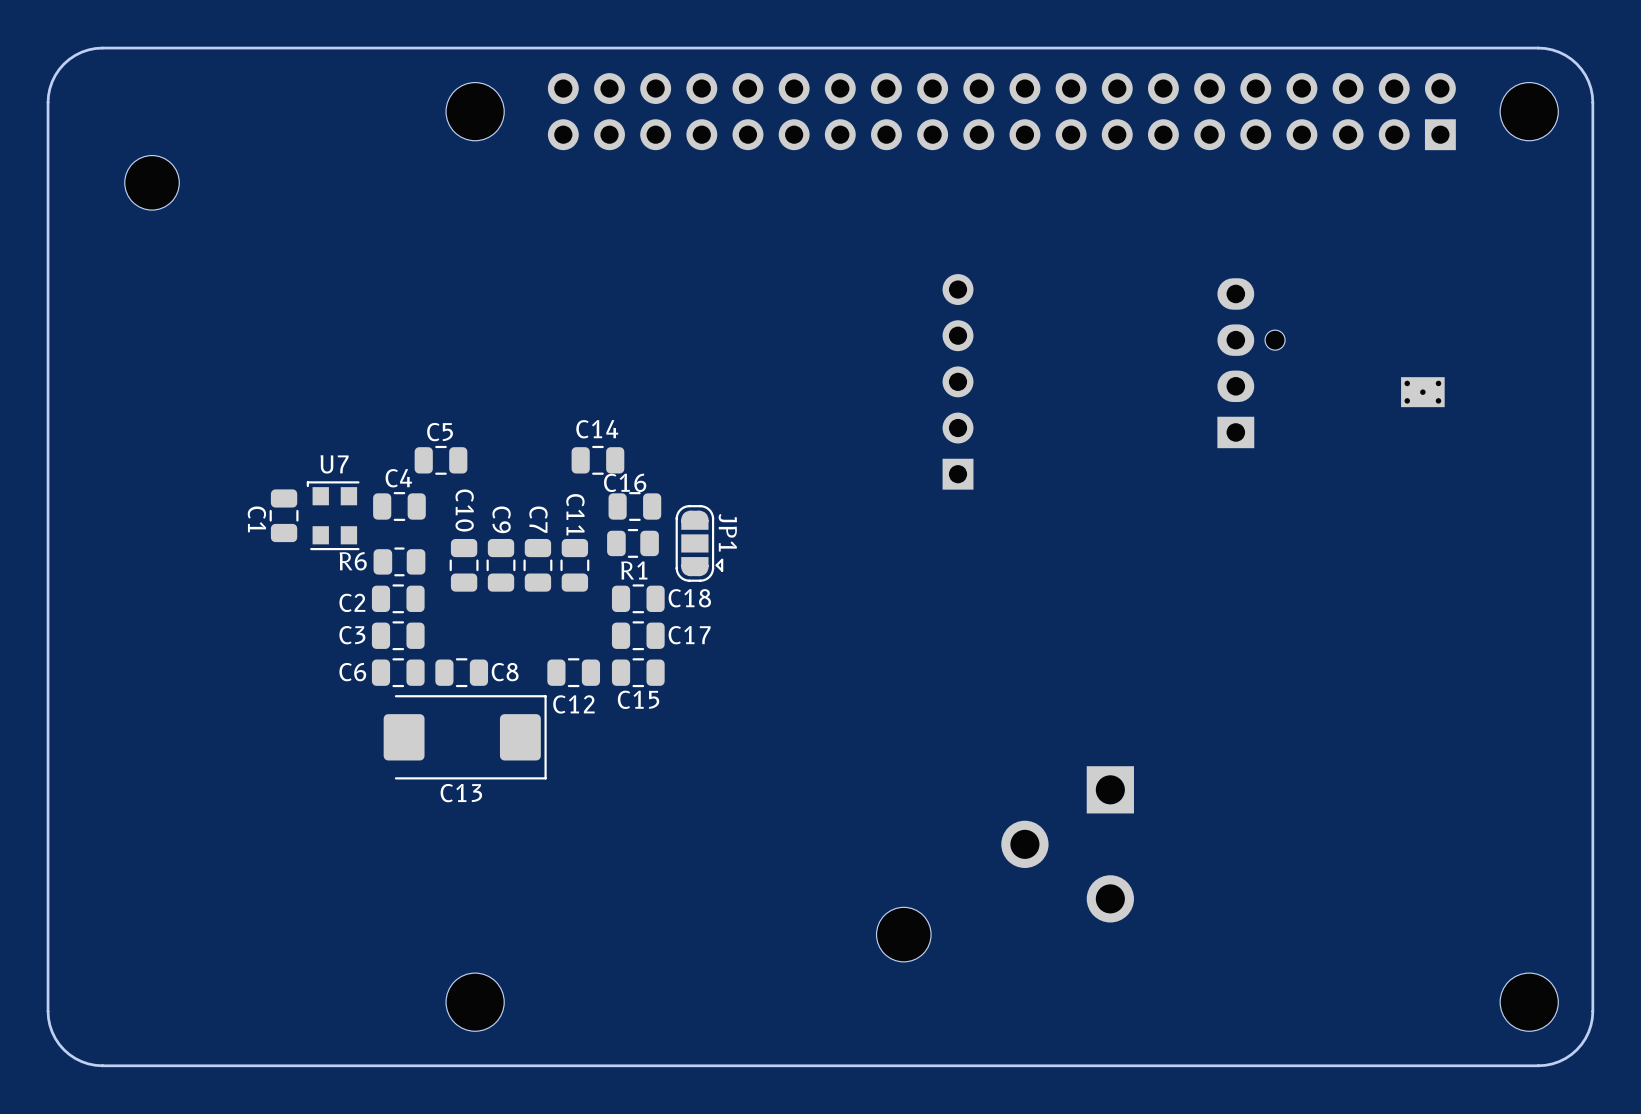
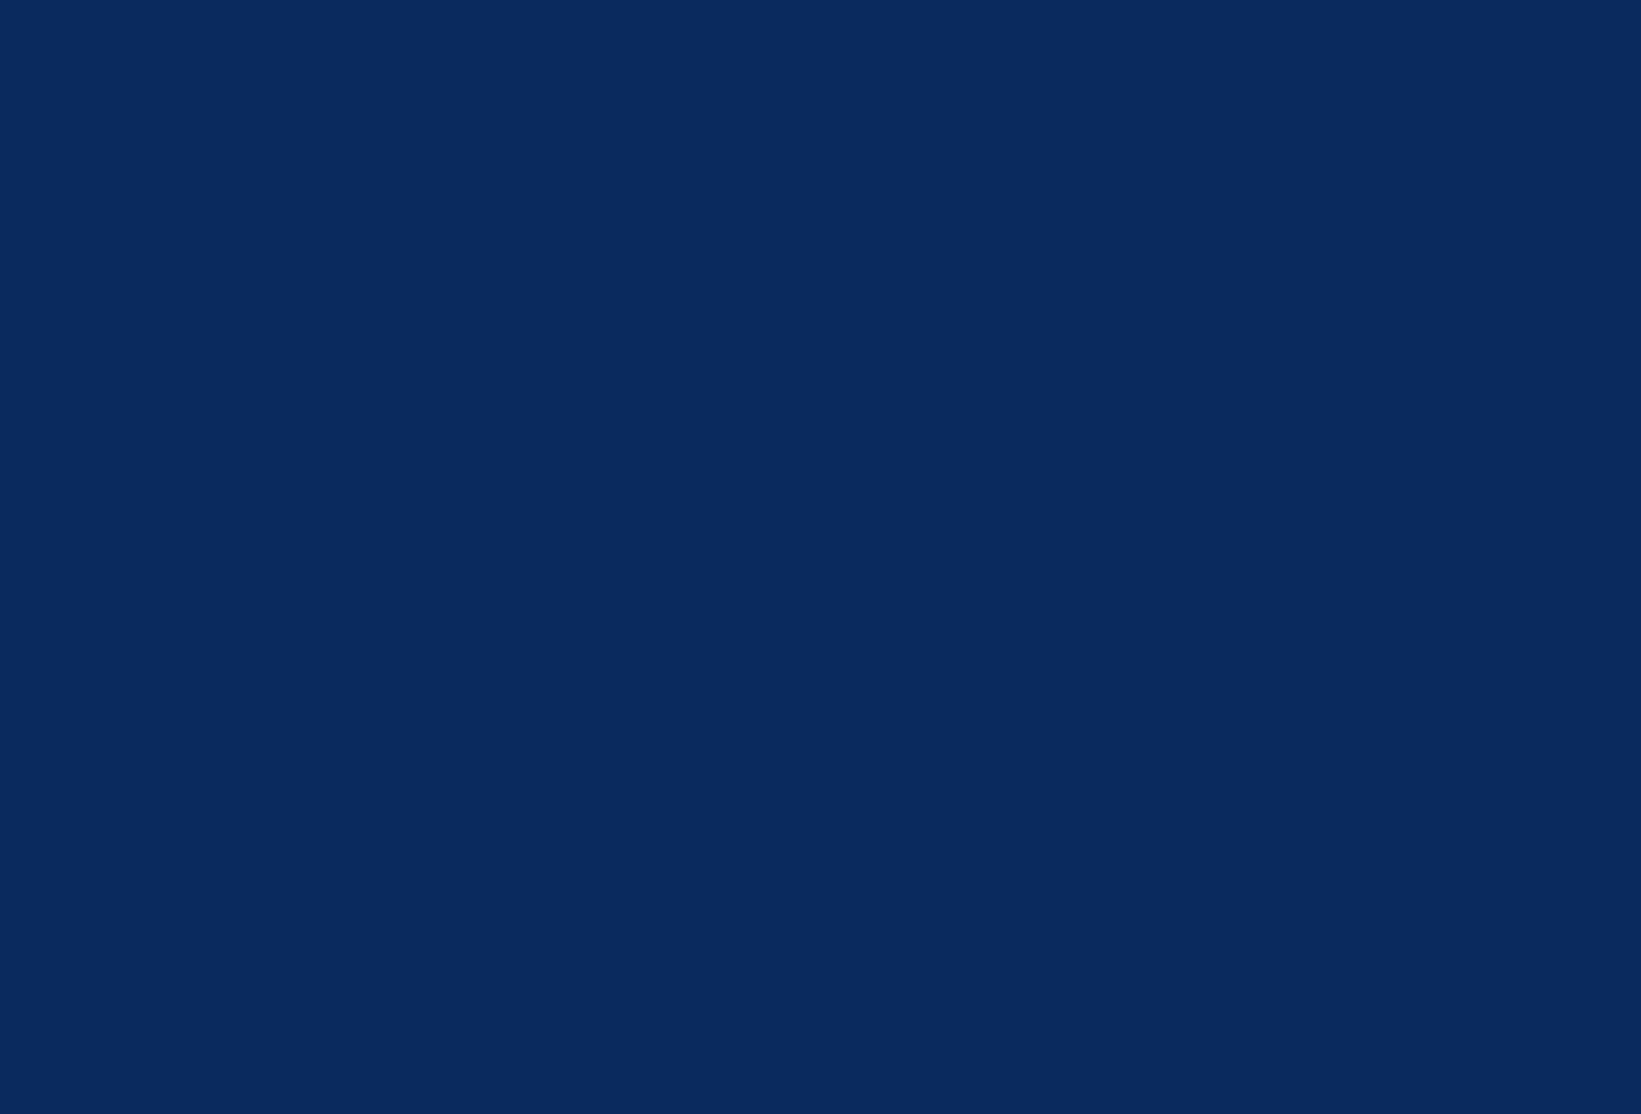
board edge: (1538, 48) (102, 48) (81, 52) (69, 59) (59, 69) (52, 81) (48, 102) (48, 1011) (49, 1025) (59, 1044) (69, 1054) (81, 1061) (102, 1065) (1538, 1065) (1559, 1061) (1571, 1054) (1585, 1038) (1590, 1025) (1592, 1011) (1592, 102) (1588, 81) (1576, 64) (1559, 52) (1538, 48) -> none
part: (475, 111) -> none
part: (1001, 111) -> none
part: (1529, 111) -> none
part: (152, 182) -> none
part: (1251, 363) -> none
part: (958, 381) -> none
part: (1422, 392) -> none
C5: (441, 460) -> none
C14: (597, 460) -> none
C4: (399, 506) -> none
C16: (634, 506) -> none
C1: (284, 515) -> none
U7: (333, 515) -> none
R1: (633, 543) -> none
JP1: (699, 543) -> none
R6: (399, 561) -> none
C10: (464, 565) -> none
C9: (501, 565) -> none
C7: (537, 565) -> none
C11: (574, 565) -> none
C2: (398, 598) -> none
C18: (638, 598) -> none
C3: (398, 635) -> none
C17: (638, 635) -> none
C6: (398, 672) -> none
C8: (461, 672) -> none
C12: (573, 672) -> none
C15: (638, 672) -> none
C13: (465, 737) -> none
part: (1067, 844) -> none
part: (903, 934) -> none
part: (475, 1002) -> none
part: (1529, 1002) -> none

